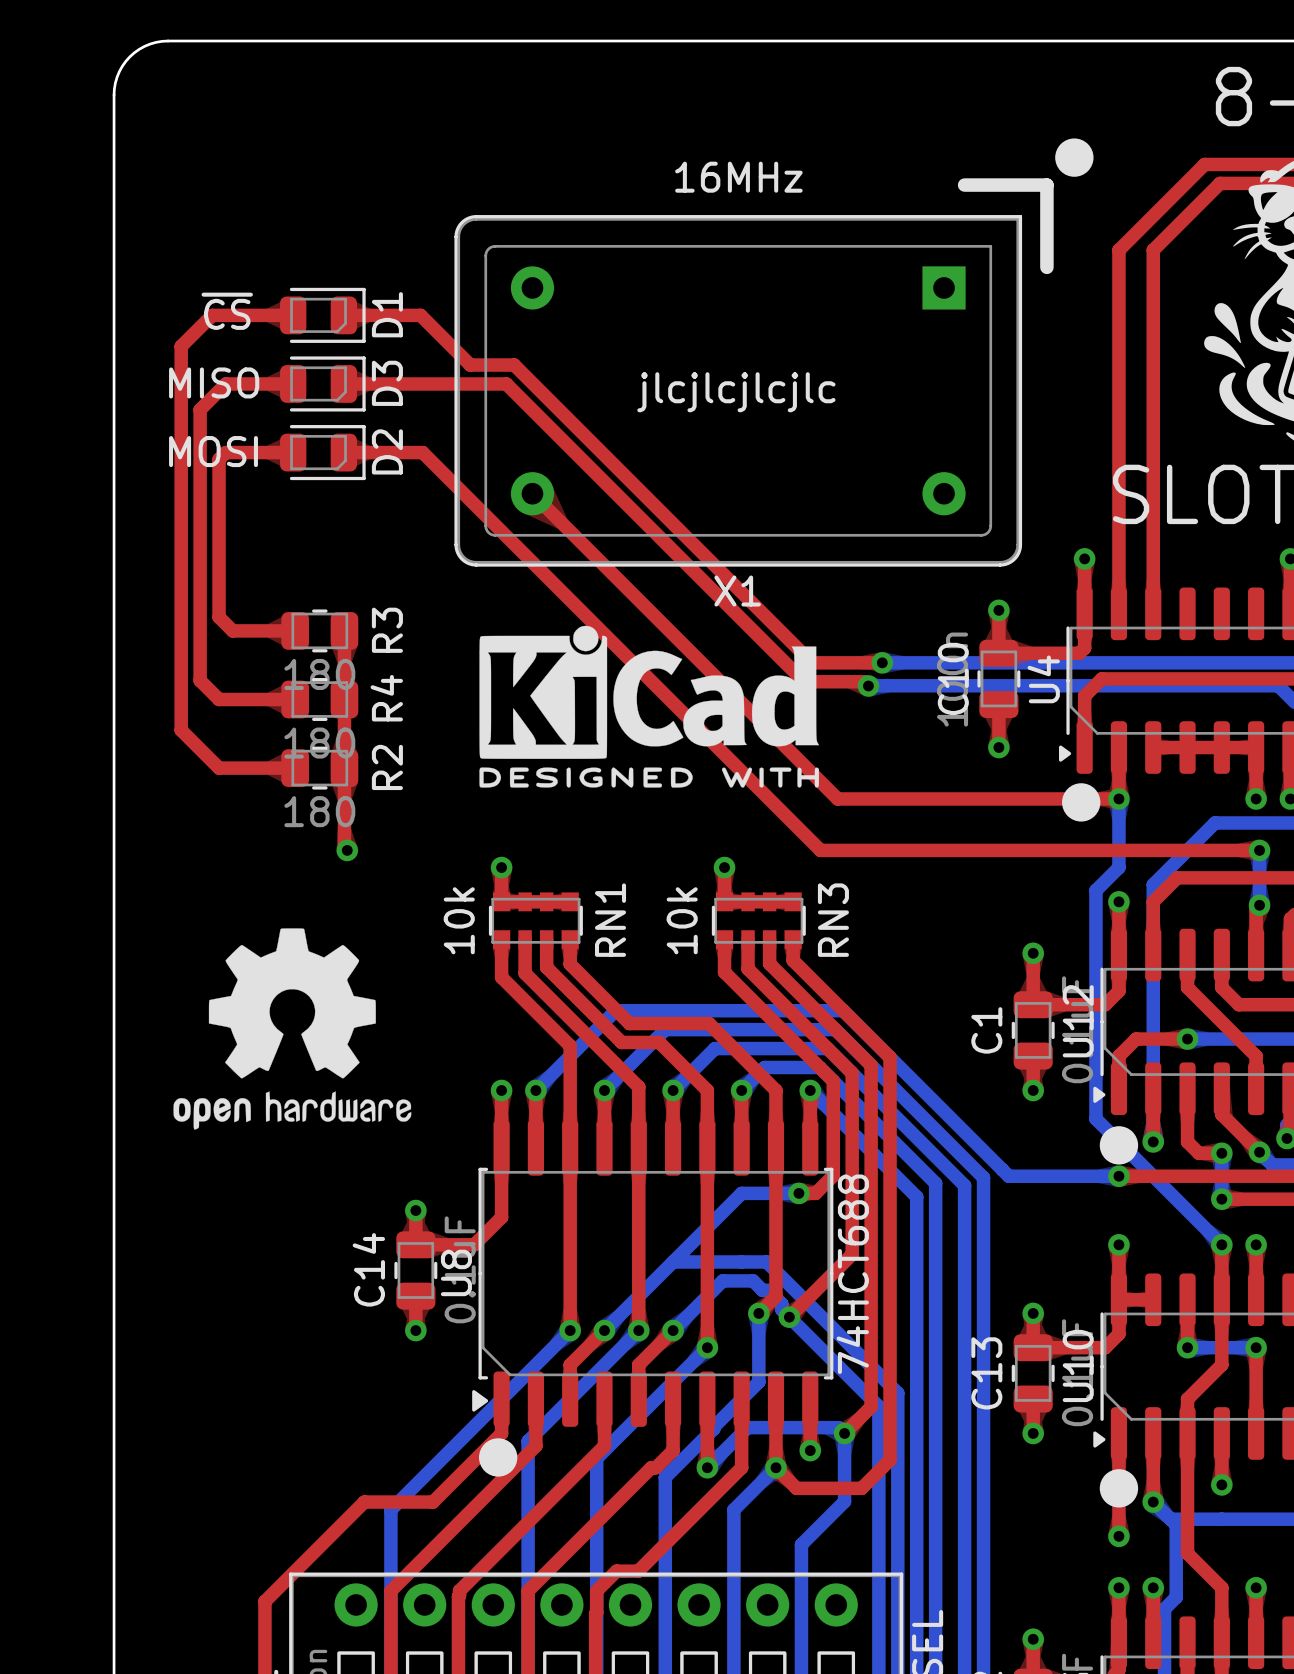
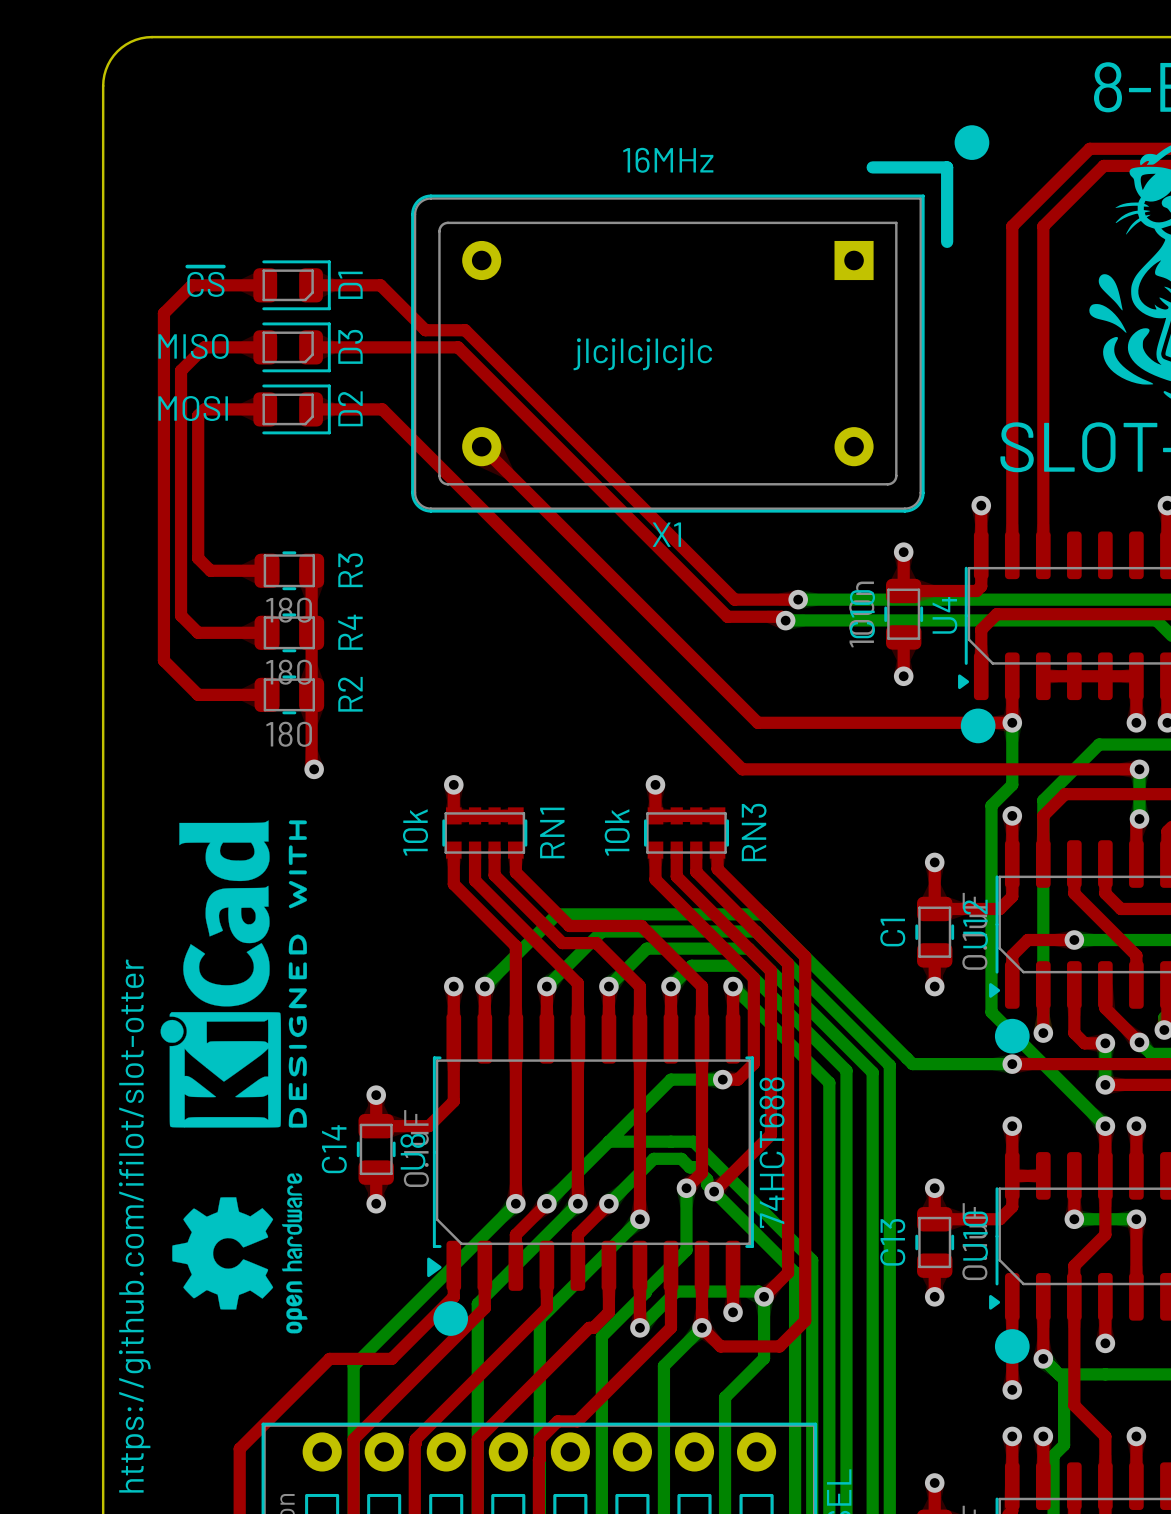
drawing: [479, 625, 820, 788] -> none
drawing: none -> [160, 820, 307, 1128]
drawing: [173, 928, 412, 1130] -> none
text: none -> https://github.com/ifilot/slot-otter (134, 1225)
drawing: none -> [172, 1173, 308, 1334]

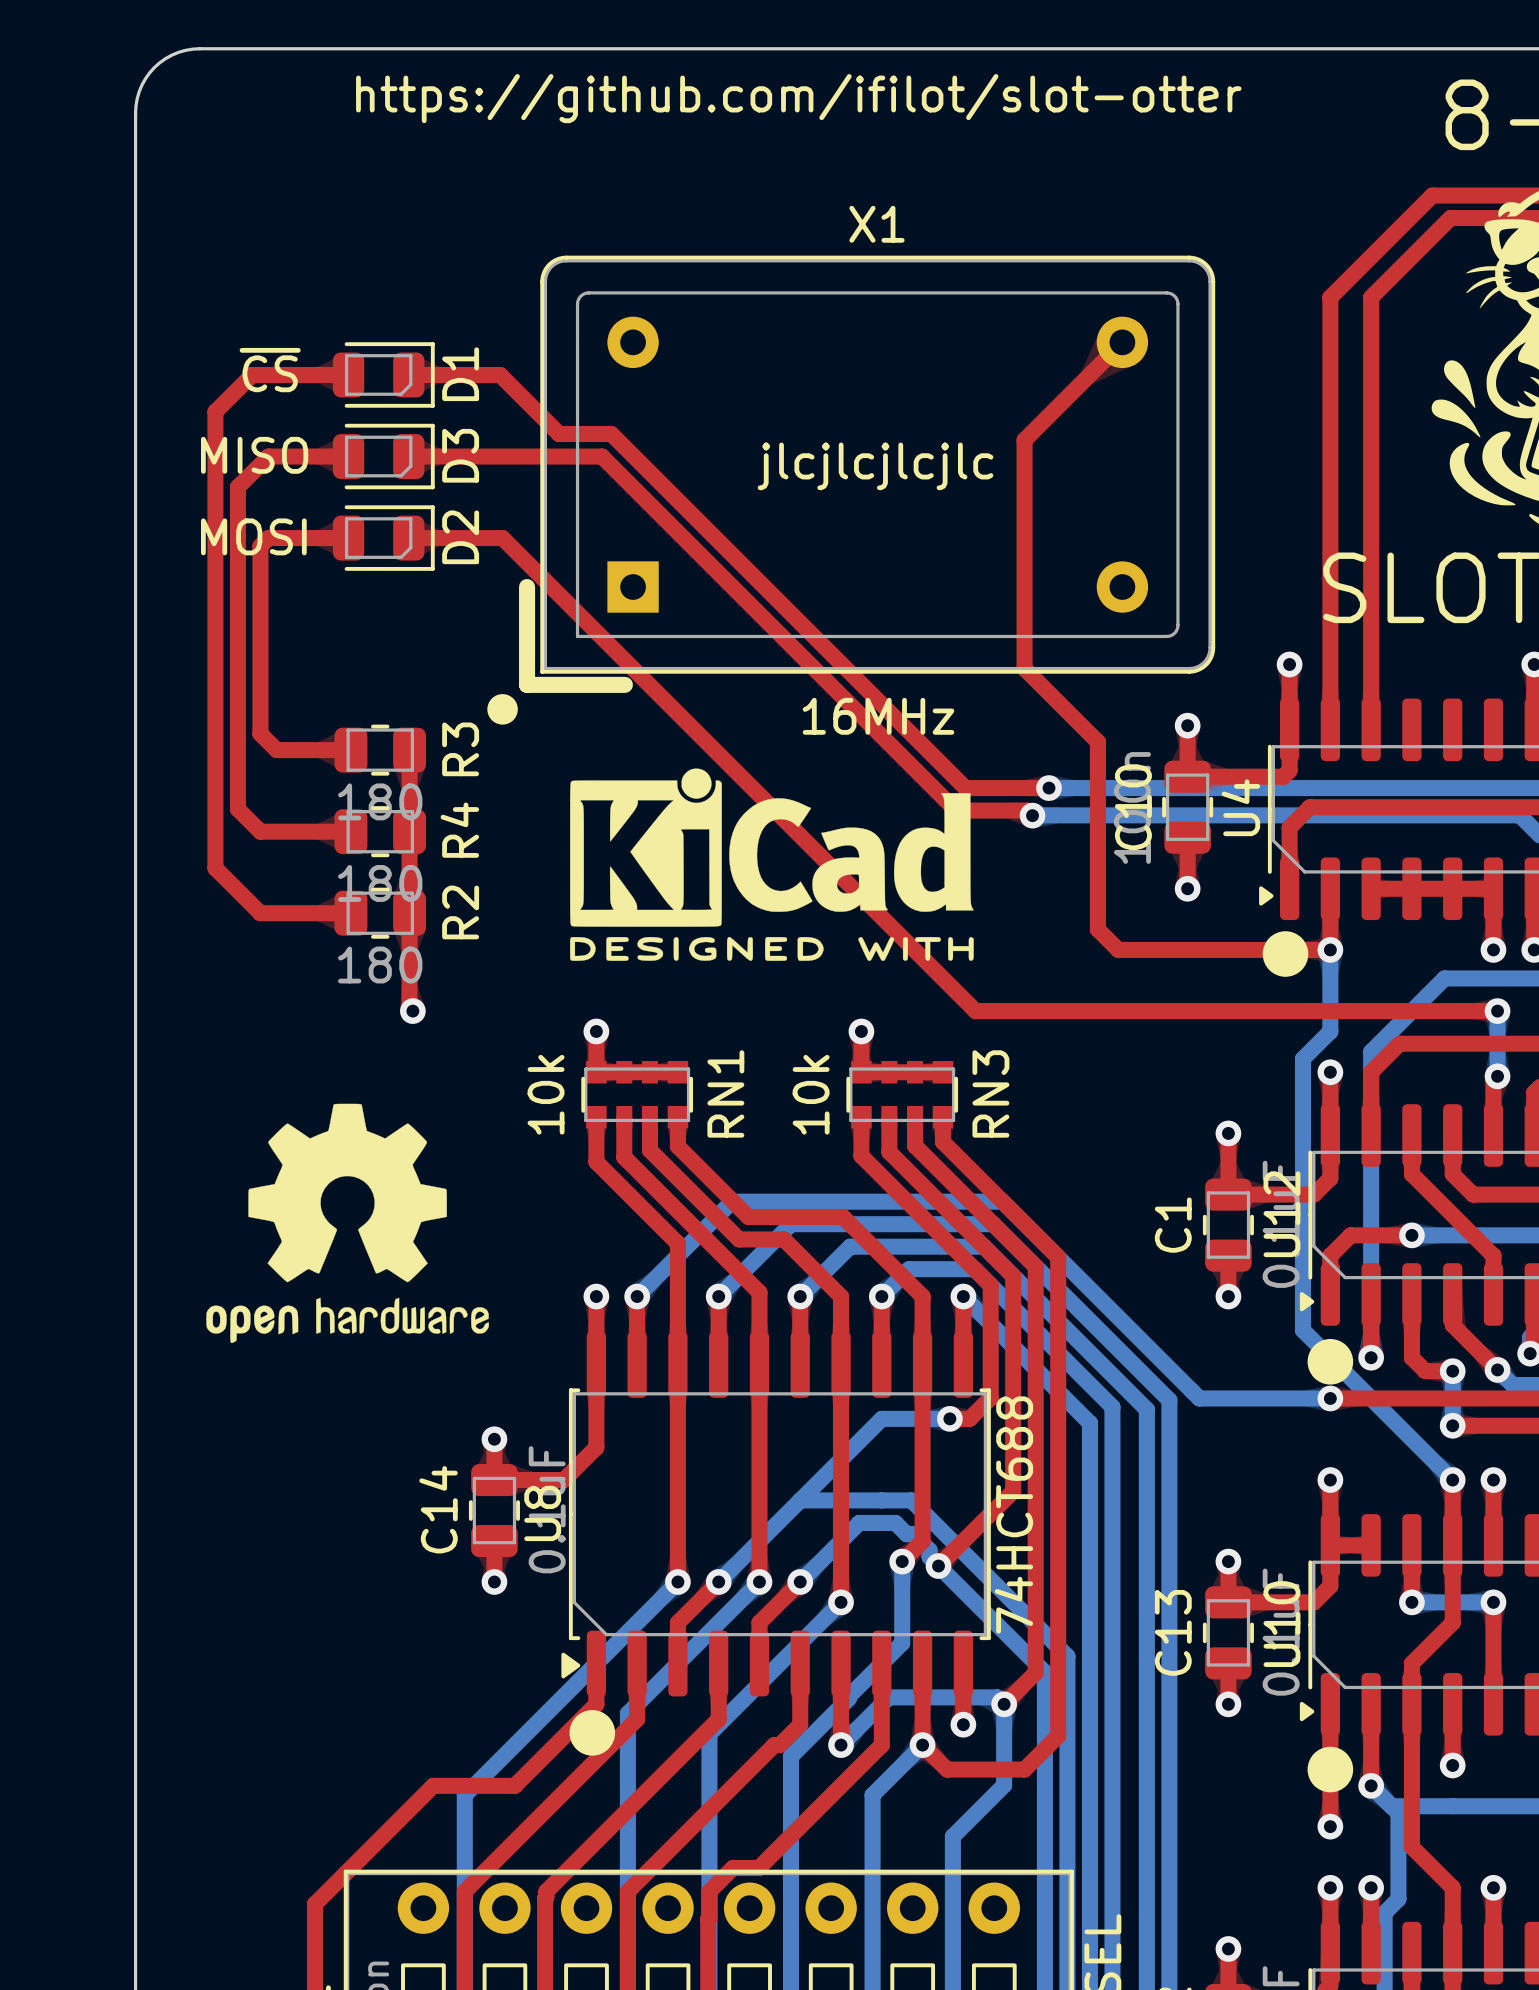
text: none -> https://github.com/ifilot/slot-otter (798, 98)
drawing: [954, 125, 990, 160] -> none
line: (872, 167) (947, 167) (947, 241) -> none
X1 rotation: 0° (667, 353) -> 180° (877, 464)
line: none -> (527, 587) (527, 684) (624, 684)
top track: (481, 446) (757, 722) (850, 722) -> (1122, 342) (1024, 440) (1024, 668) (1097, 741) (1097, 929) (1118, 949)
drawing: none -> [487, 694, 518, 725]
drawing: none -> [570, 768, 974, 961]
drawing: [160, 820, 307, 1128] -> none
drawing: none -> [206, 1103, 489, 1344]
drawing: [172, 1173, 308, 1334] -> none
text: https://github.com/ifilot/slot-otter (134, 1225) -> none

